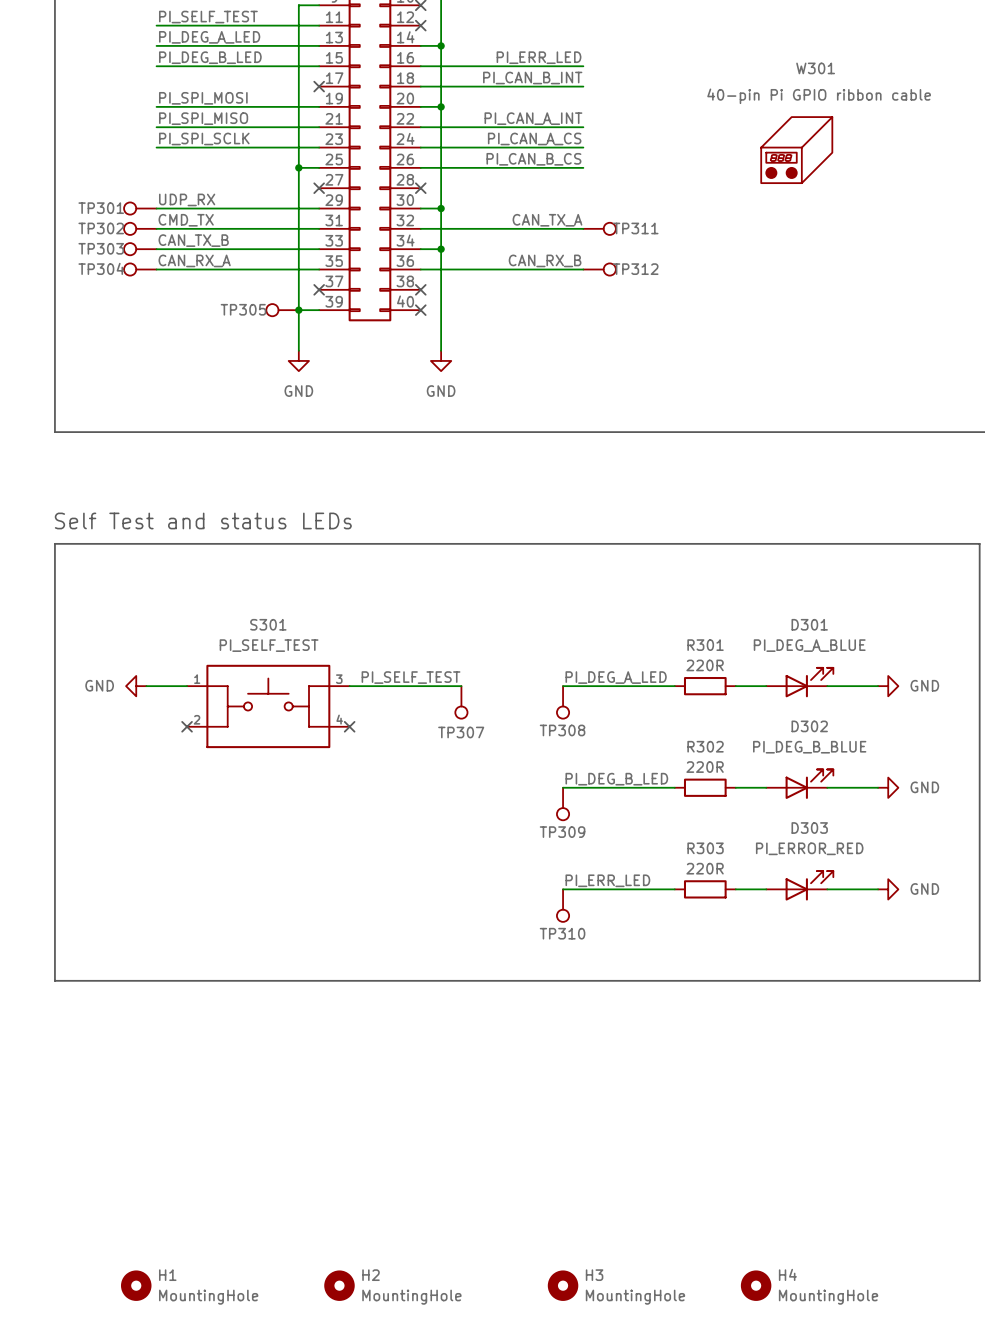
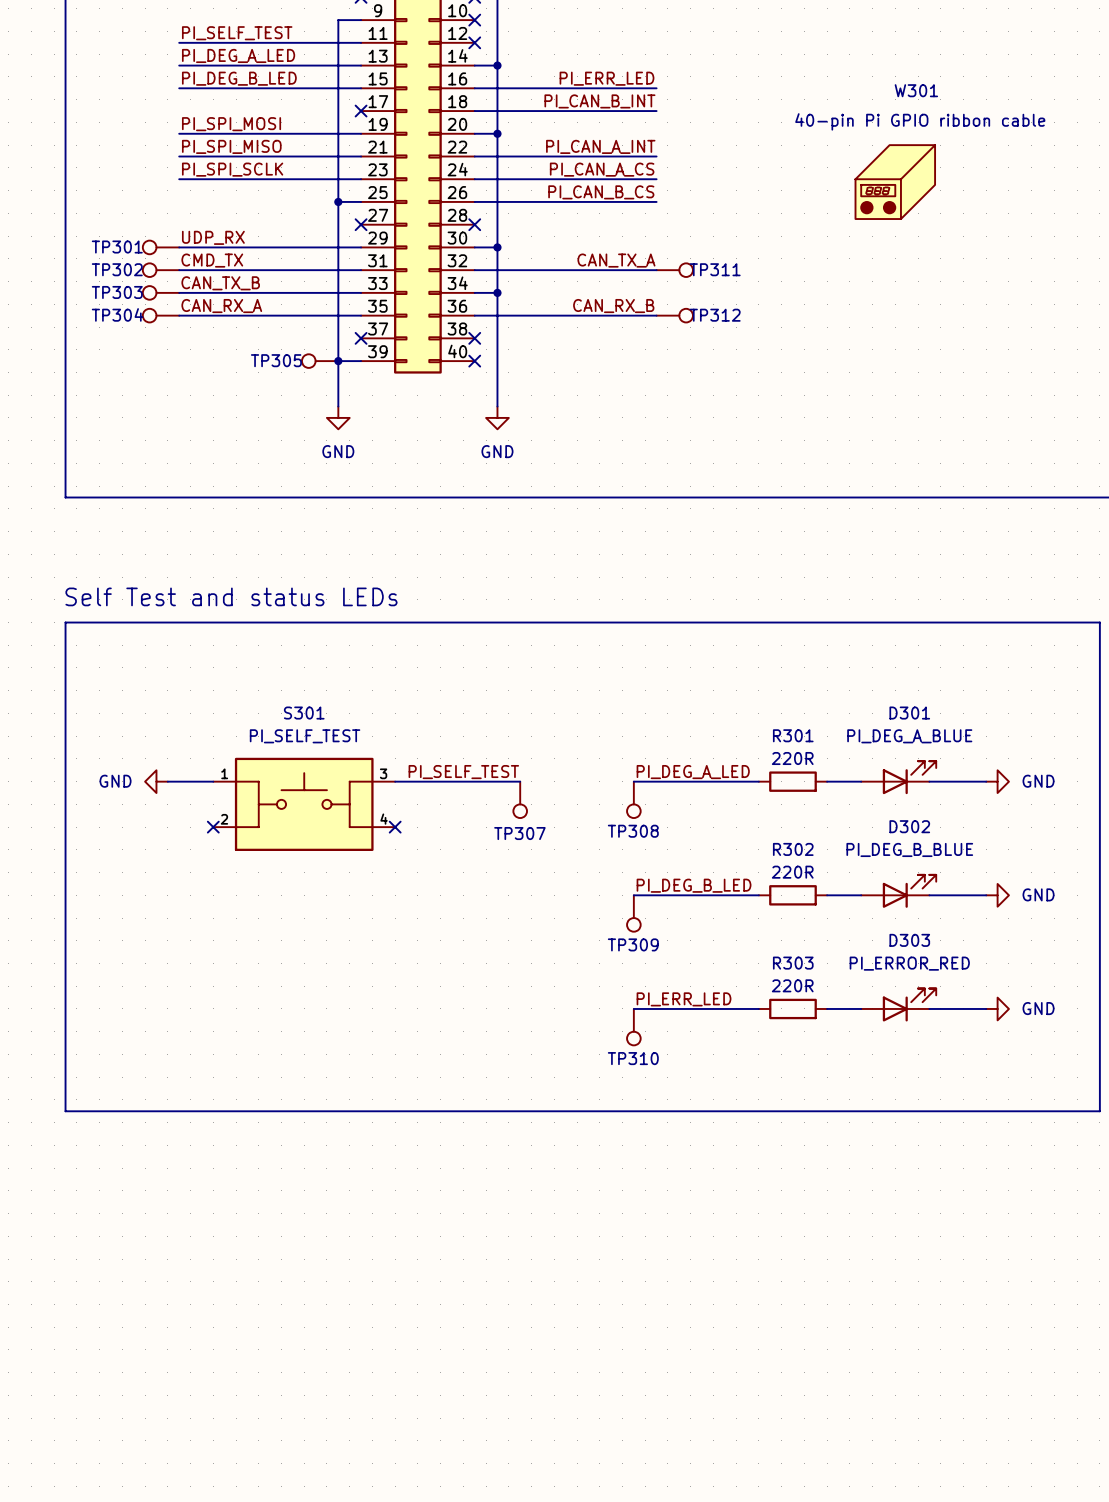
H1: MountingHole (136, 1285) -> none
H2: MountingHole (339, 1285) -> none
H3: MountingHole (563, 1285) -> none
H4: MountingHole (756, 1285) -> none

